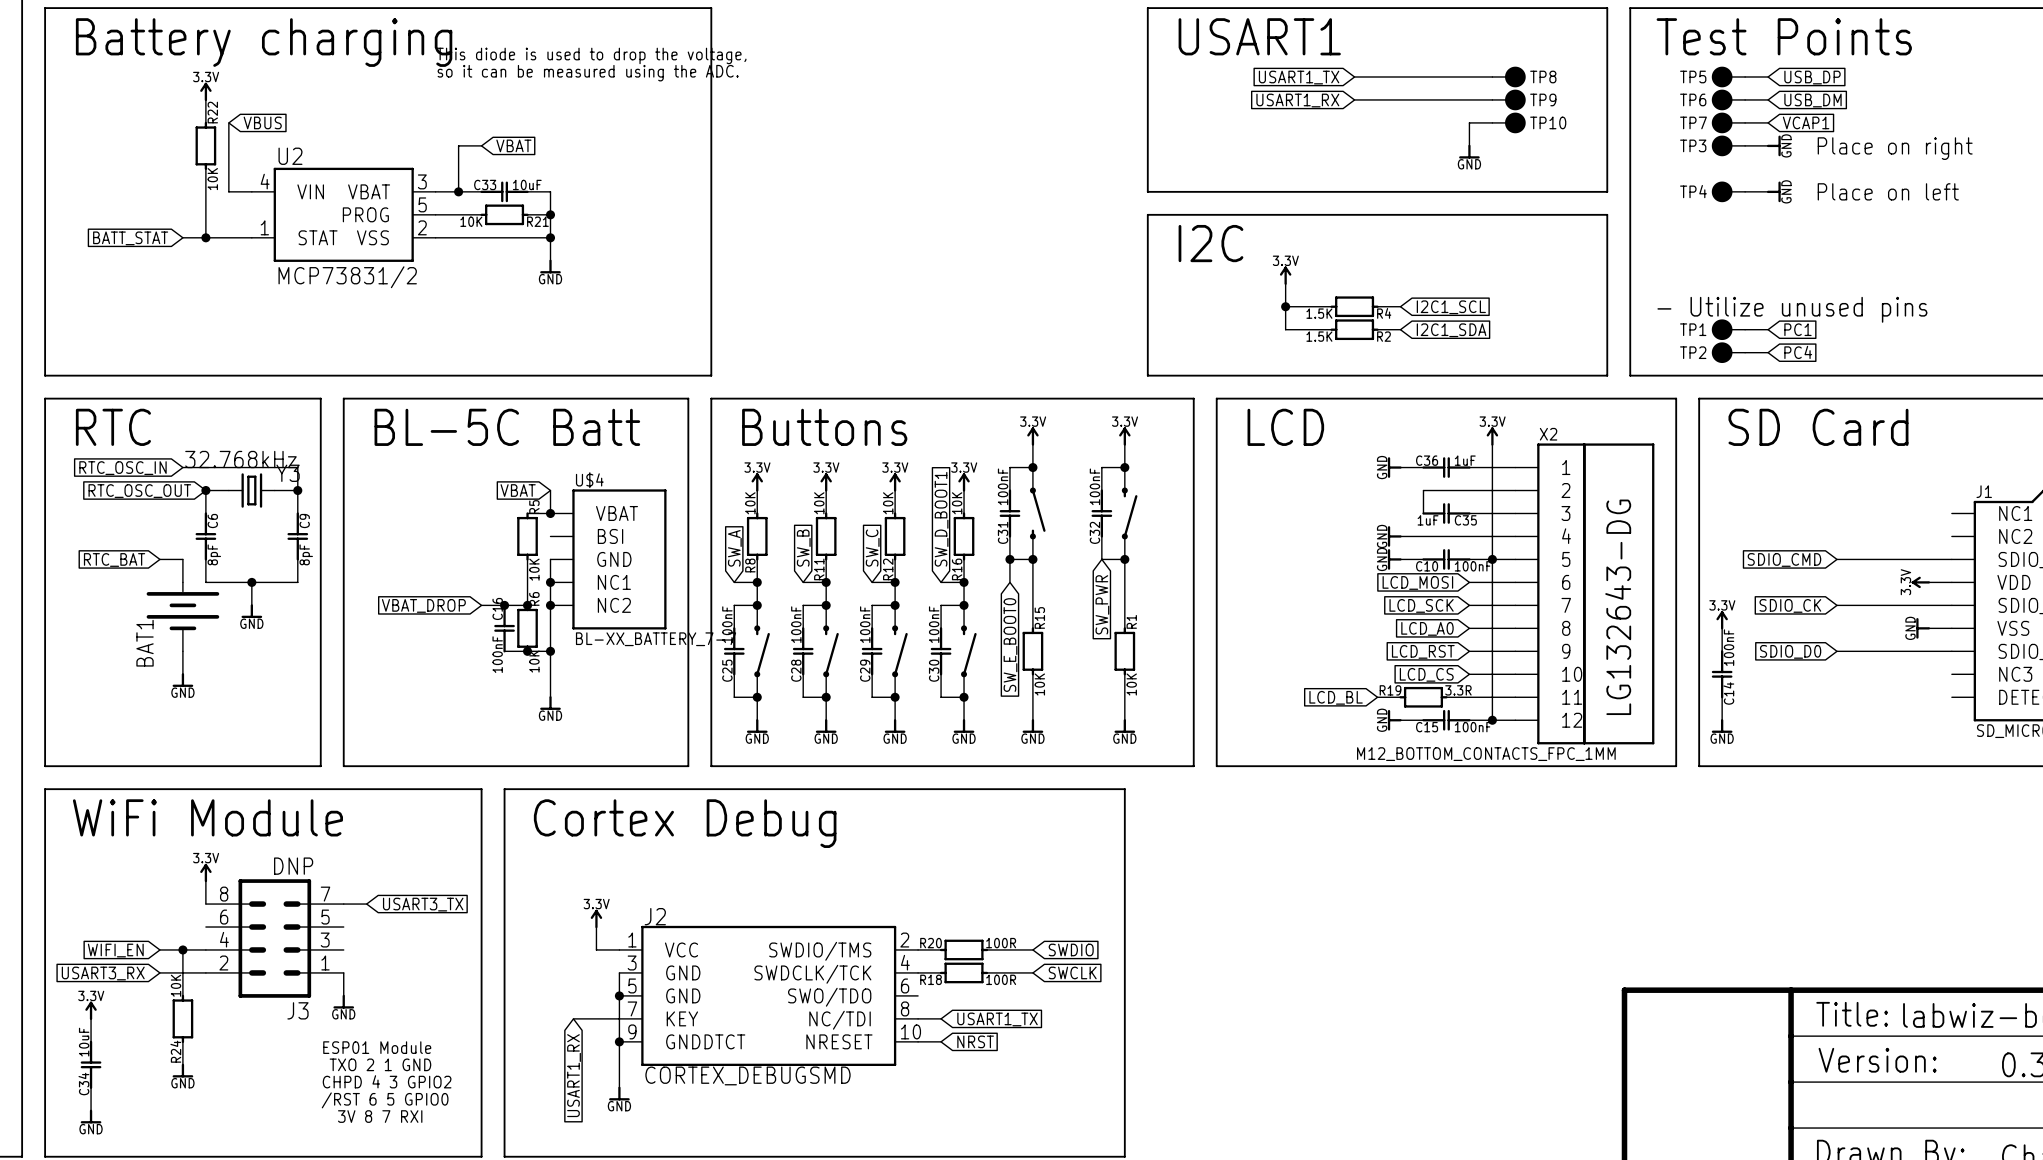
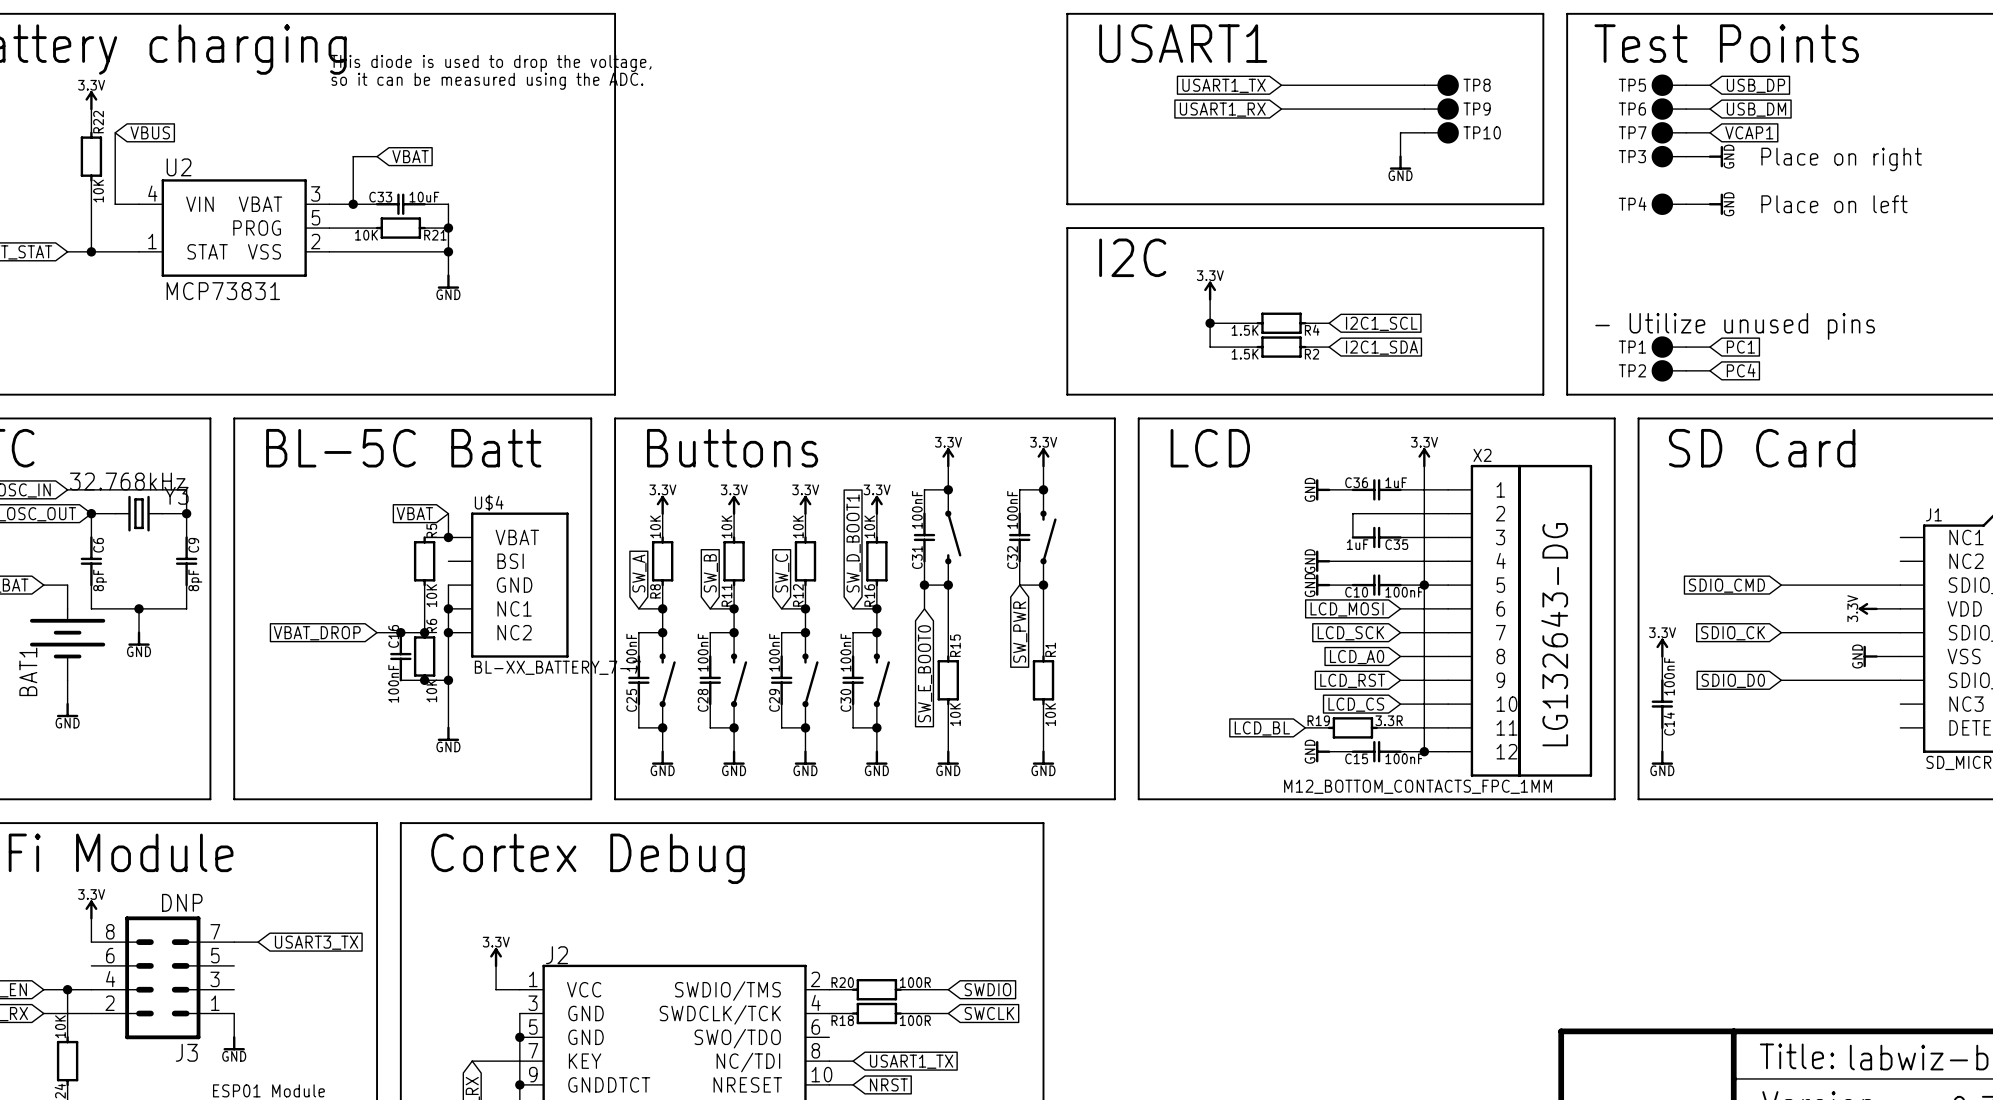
U2 value: MCP73831/2 (347, 277) -> MCP73831 (223, 291)

